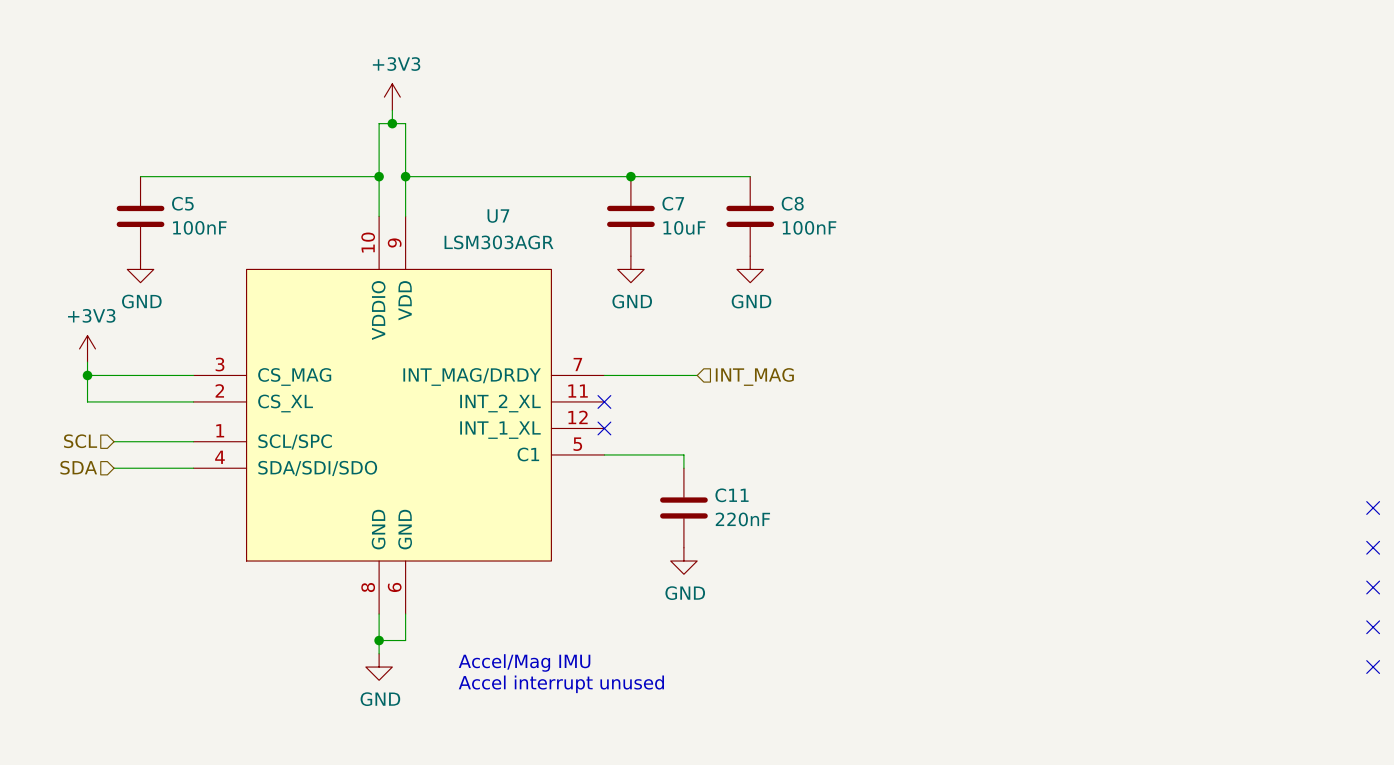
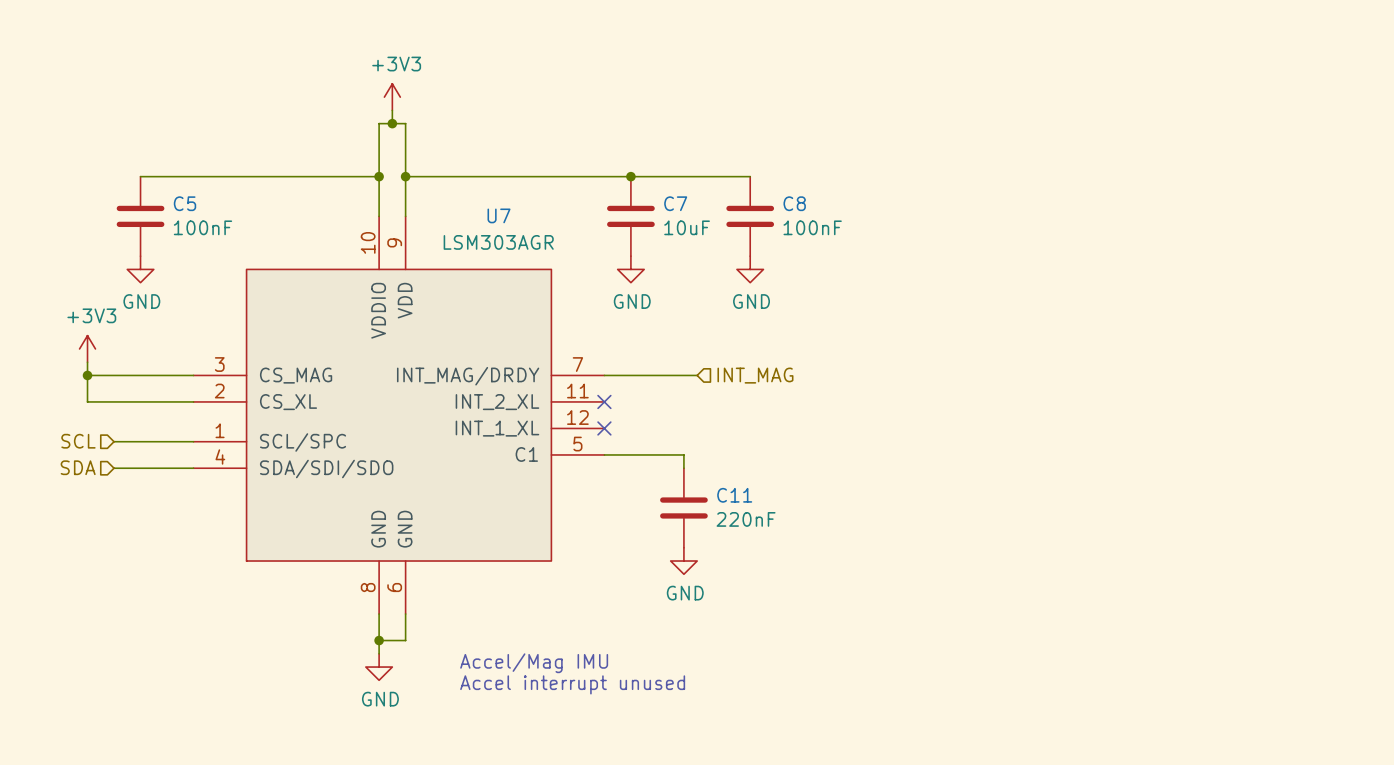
no-connect mark: (1373, 507) -> none
no-connect mark: (1373, 547) -> none
no-connect mark: (1373, 587) -> none
no-connect mark: (1373, 627) -> none
no-connect mark: (1373, 667) -> none

